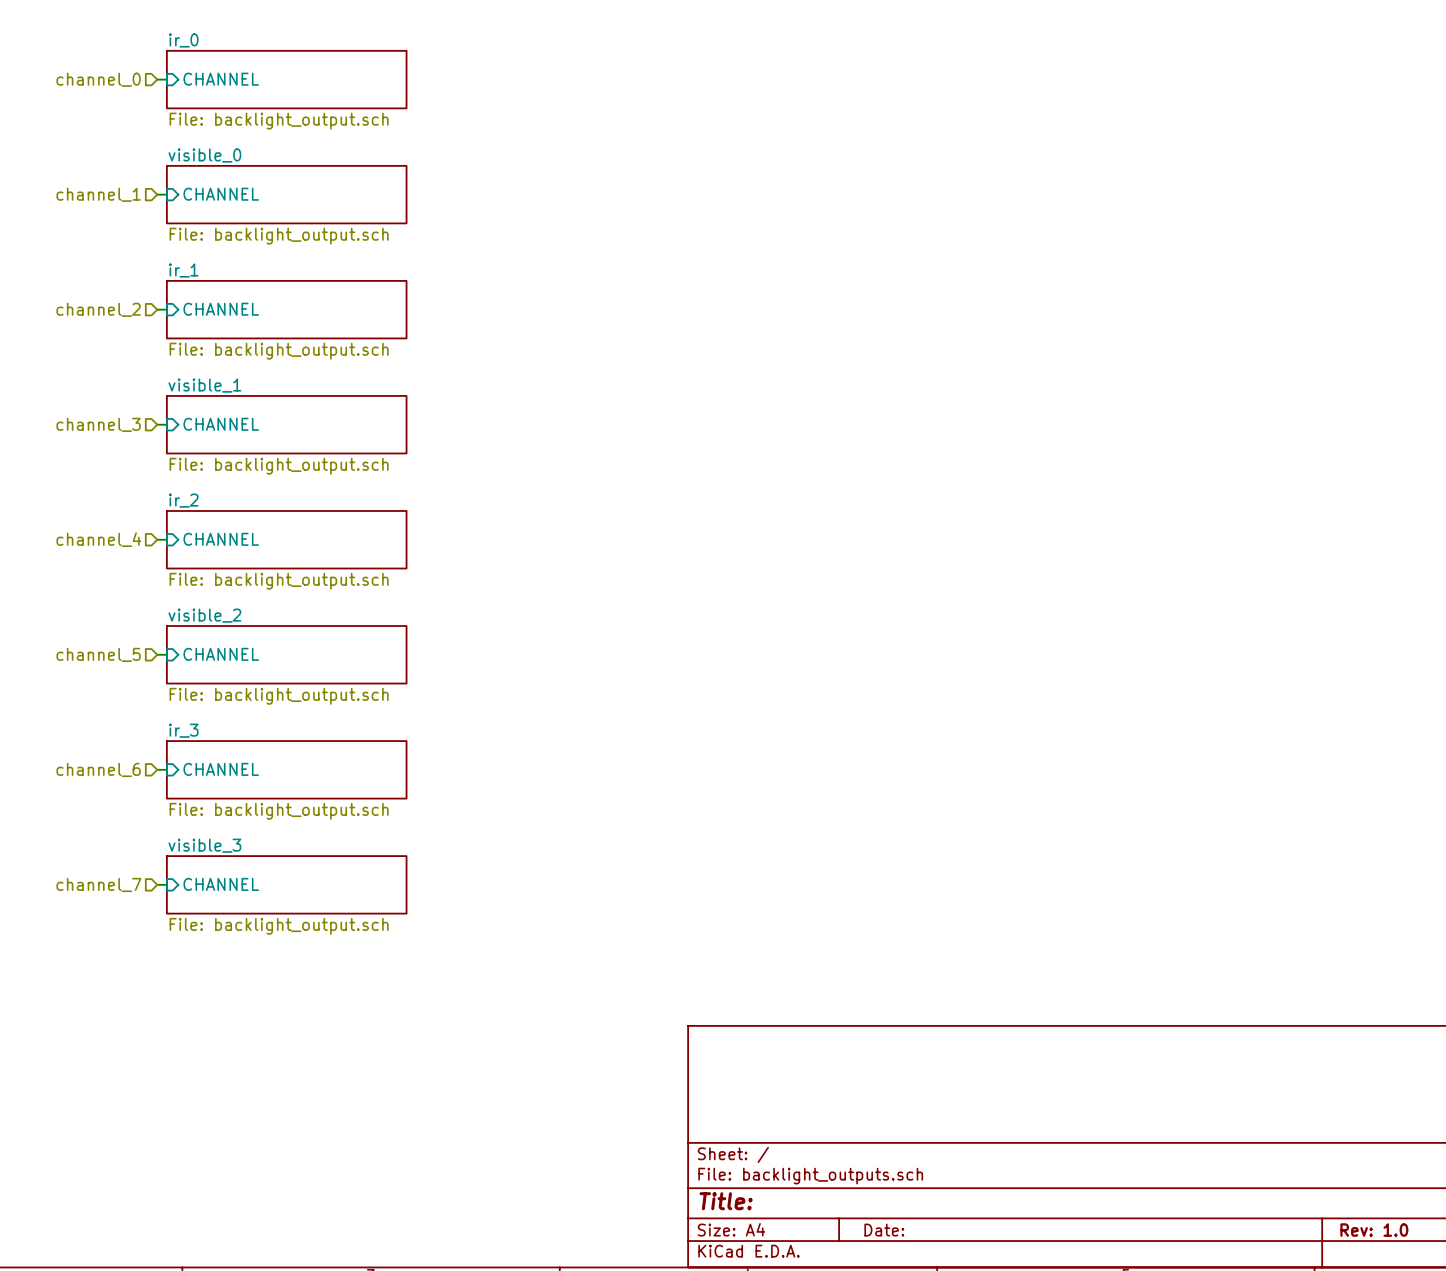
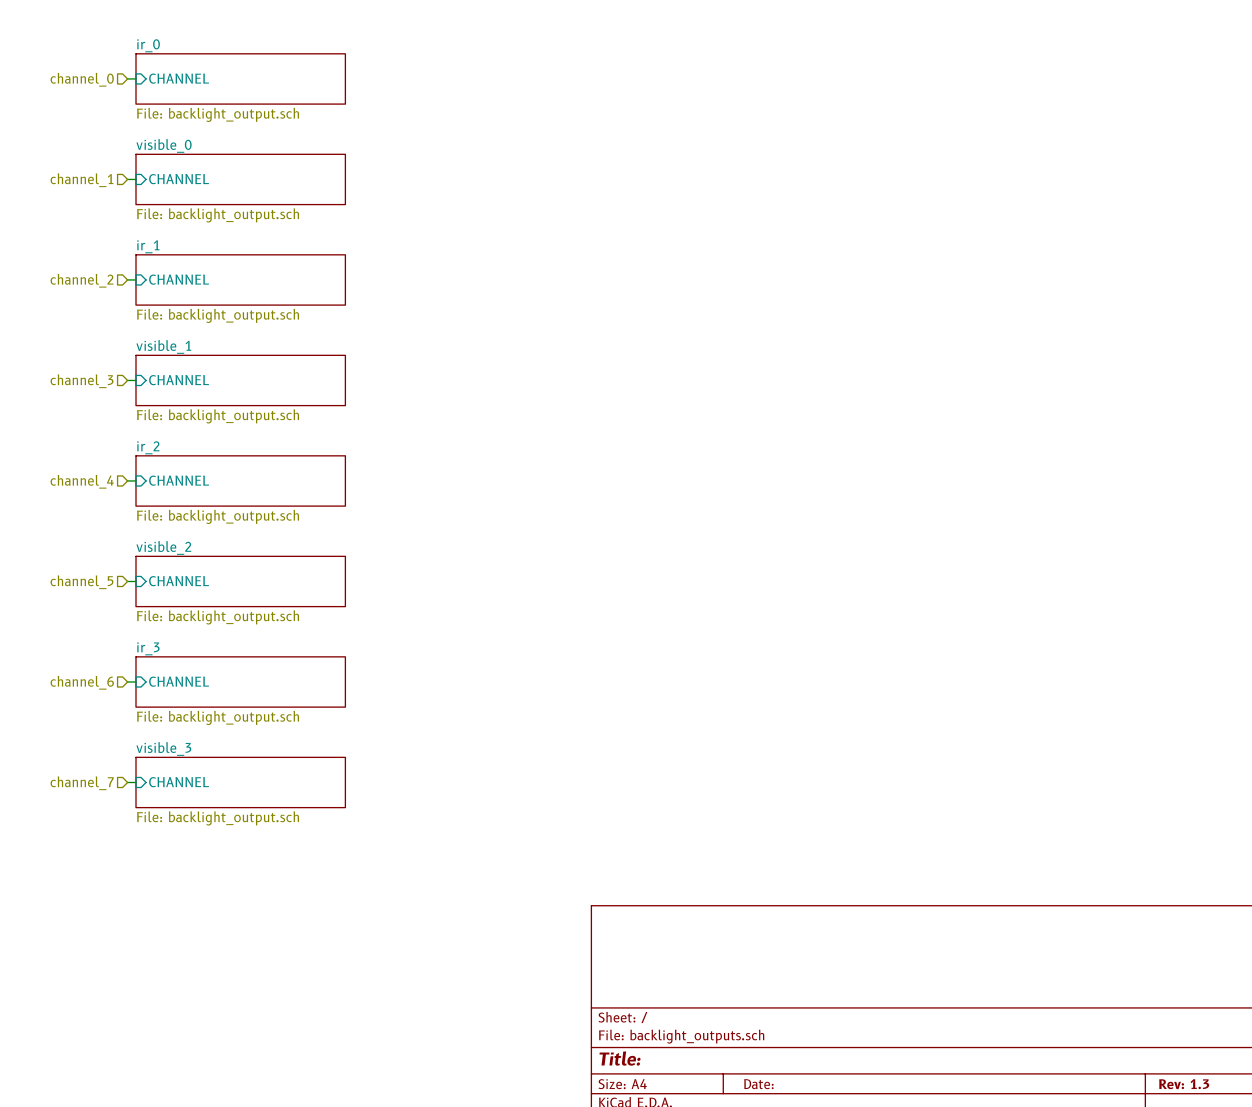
title block: Rev: 1.0 (1374, 1230) -> Rev: 1.3 (1184, 1084)

